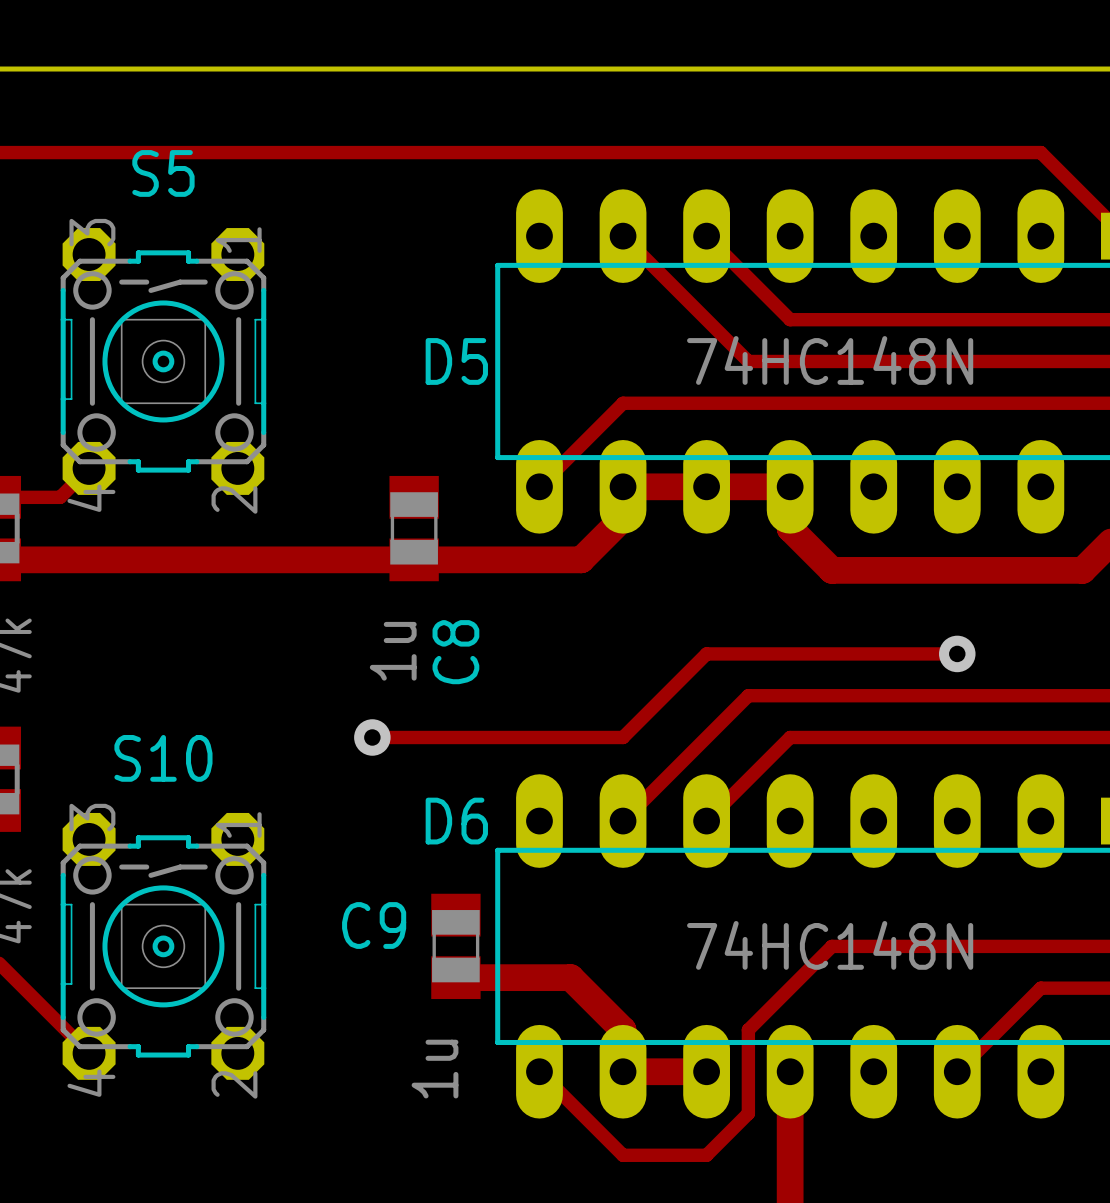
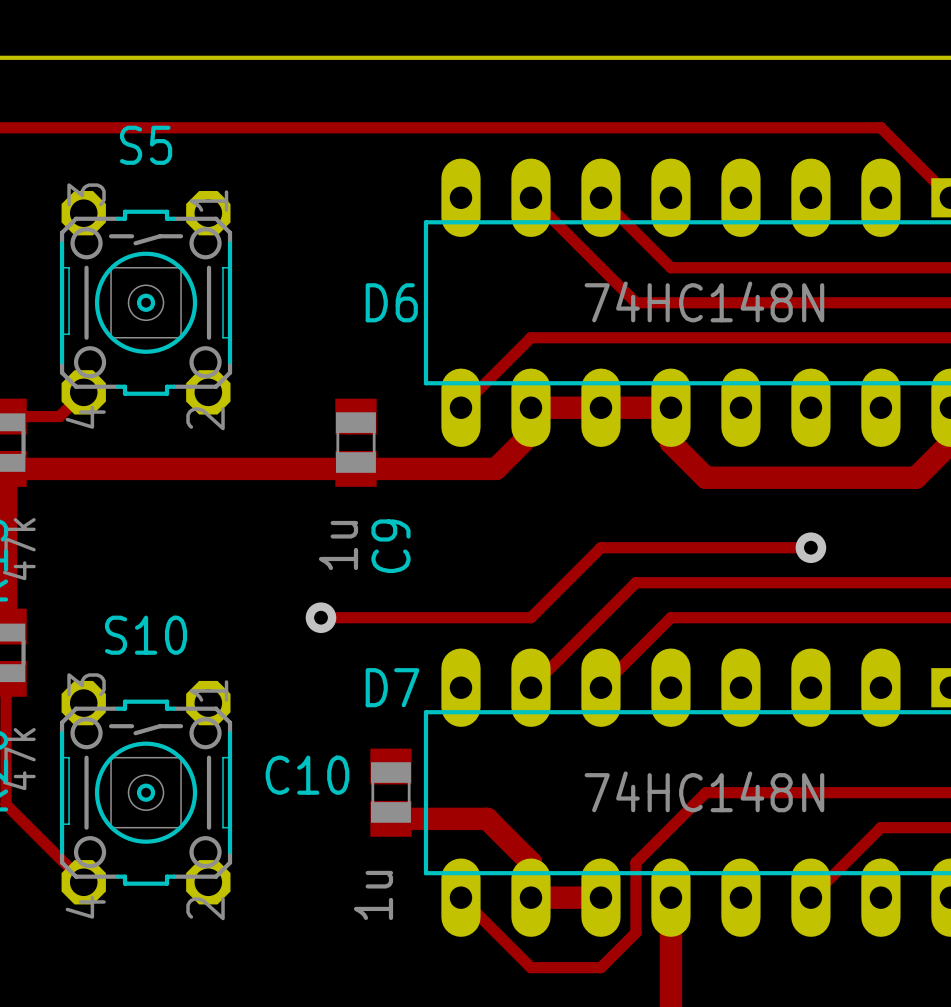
D5 name: D5 (456, 361) -> D6 (391, 302)
C8 name: C8 (455, 652) -> C9 (390, 546)
D6 name: D6 (456, 821) -> D7 (392, 687)
C9 name: C9 (374, 925) -> C10 (307, 775)

